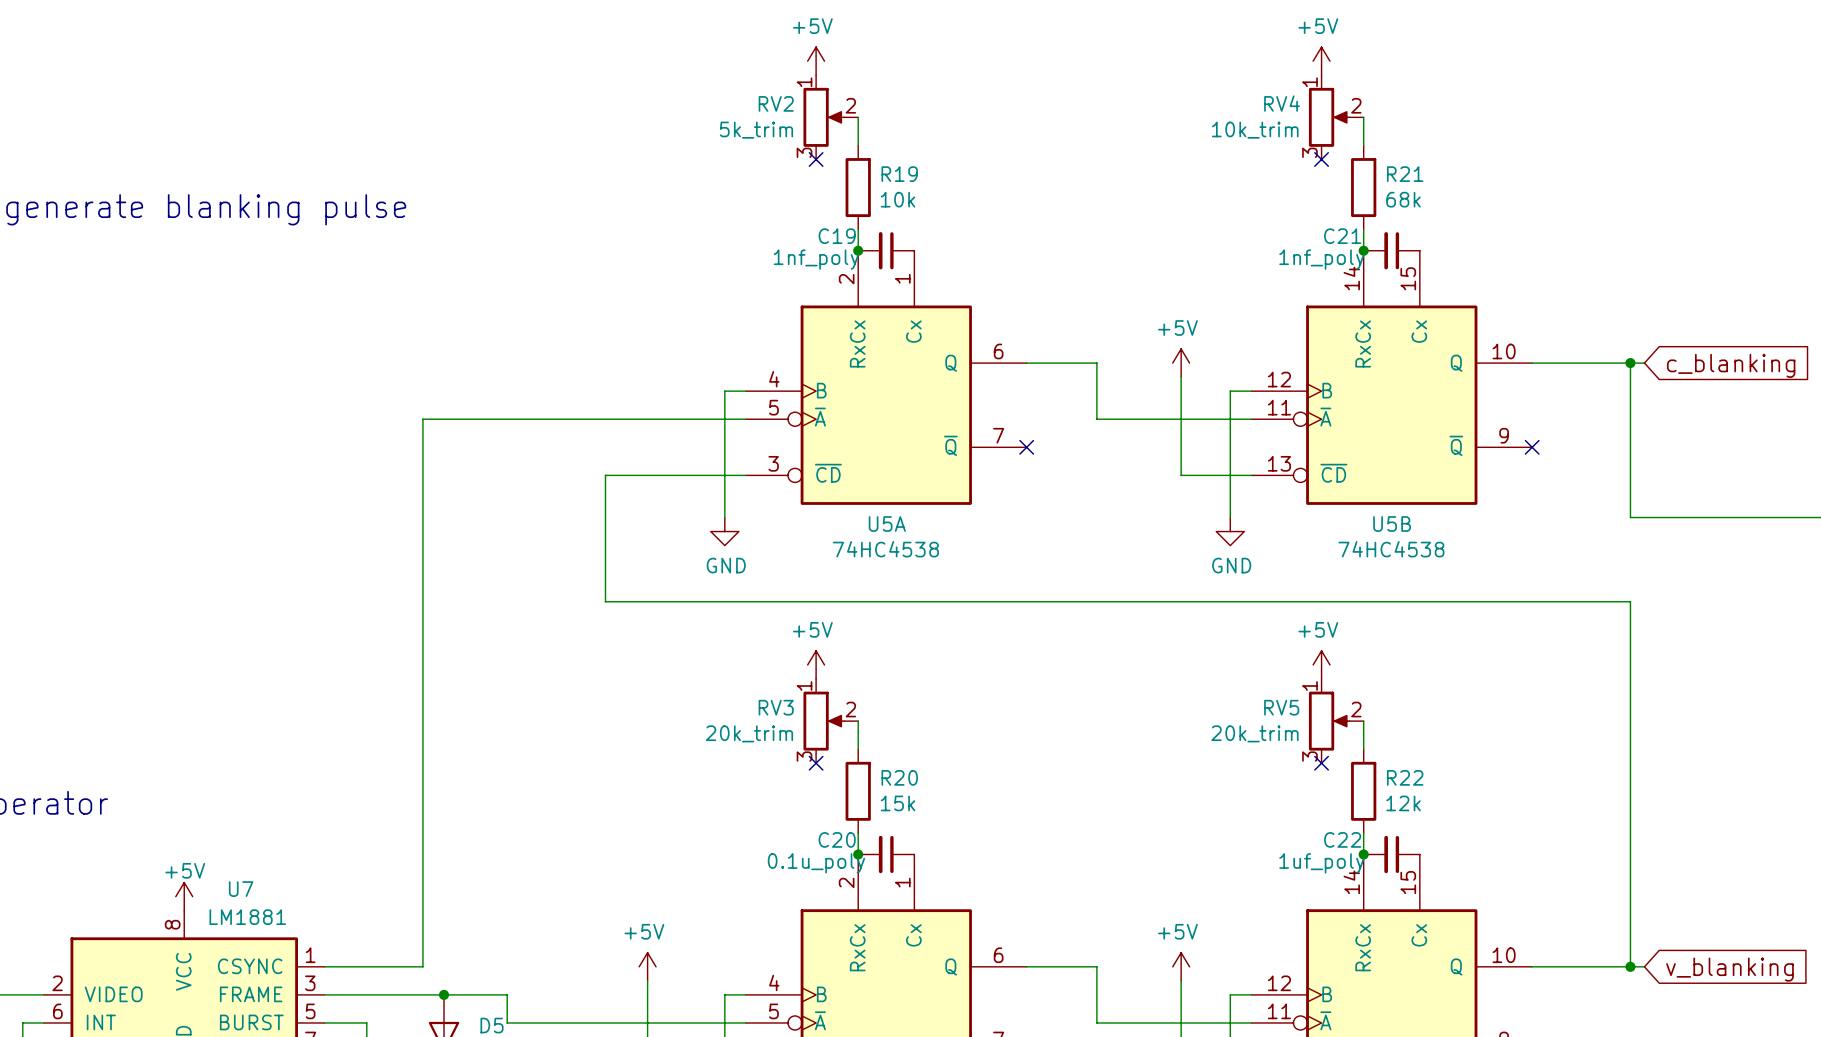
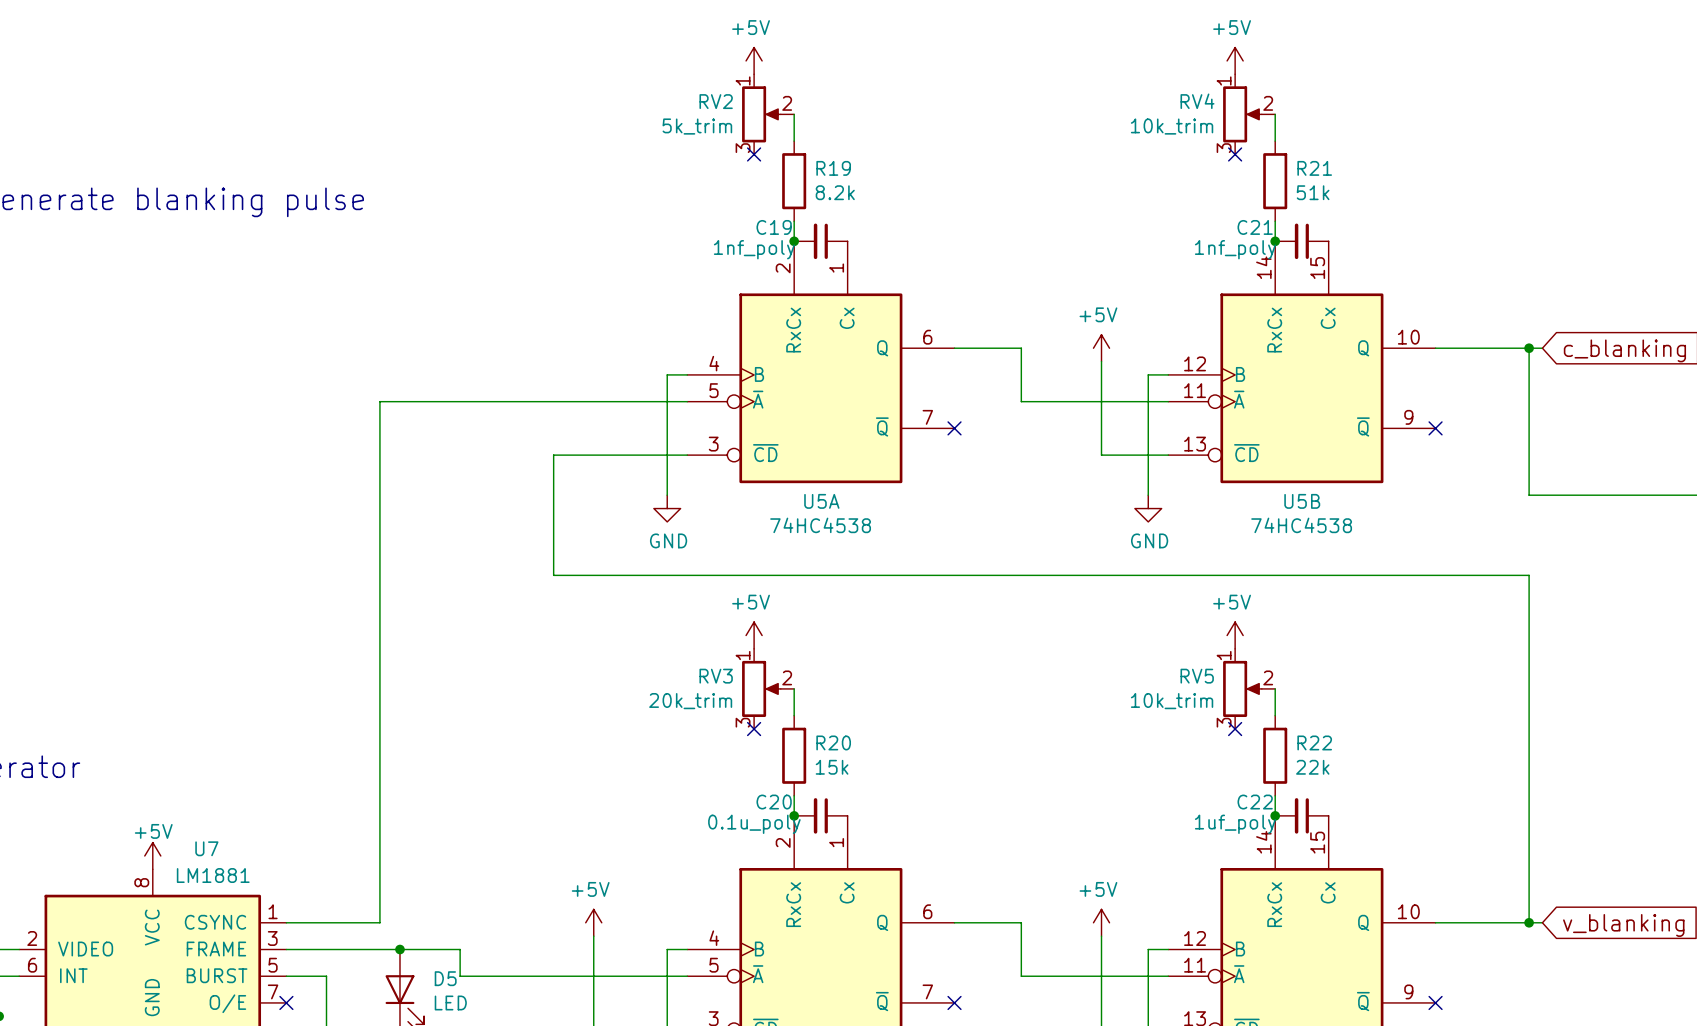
R19 value: 10k (898, 199) -> 8.2k (835, 192)
R21 value: 68k (1403, 199) -> 51k (1313, 192)
RV5 value: 20k_trim (1254, 733) -> 10k_trim (1172, 701)
R22 value: 12k (1403, 803) -> 22k (1312, 767)

